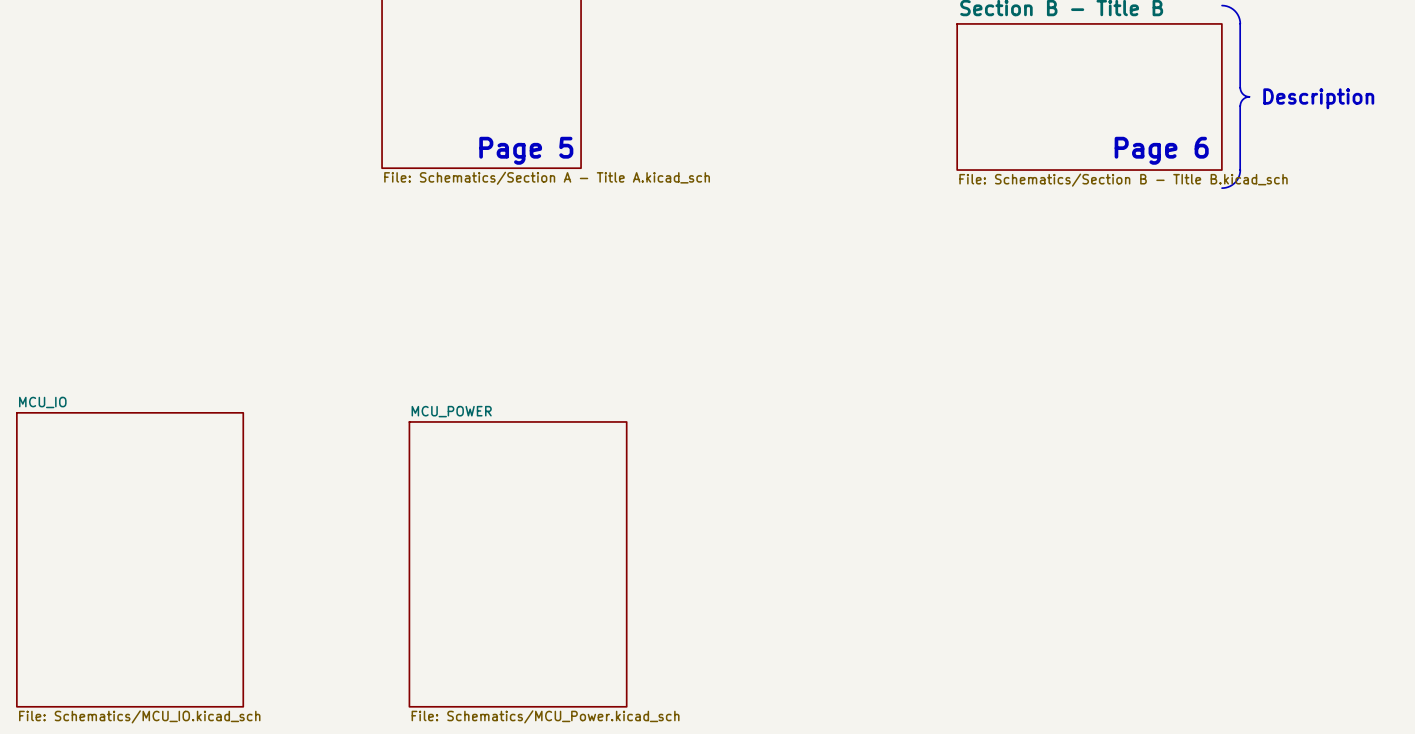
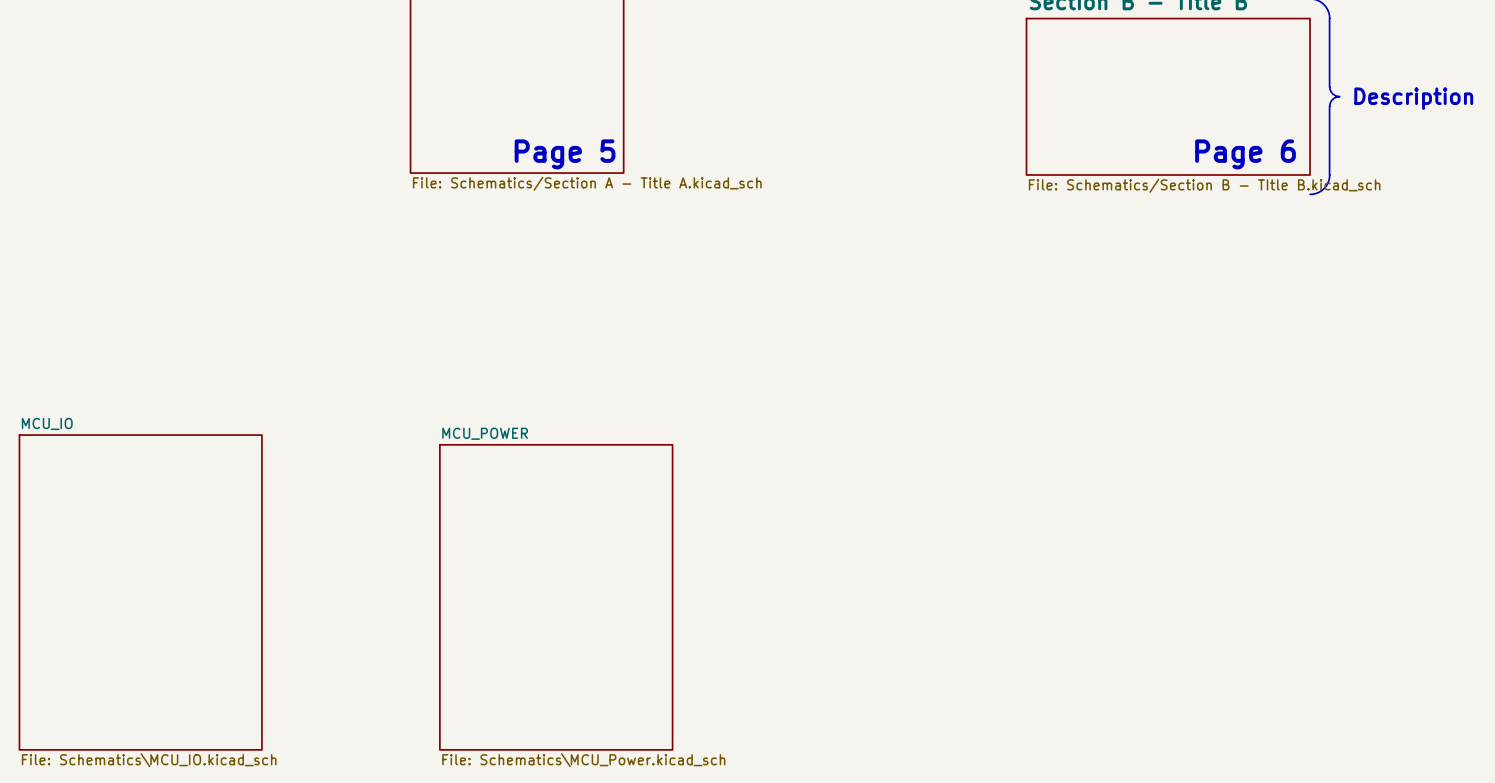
sheet MCU_IO value: File: Schematics/MCU_IO.kicad_sch (139, 716) -> File: Schematics\MCU_IO.kicad_sch (149, 760)
sheet MCU_POWER value: File: Schematics/MCU_Power.kicad_sch (545, 716) -> File: Schematics\MCU_Power.kicad_sch (583, 760)

